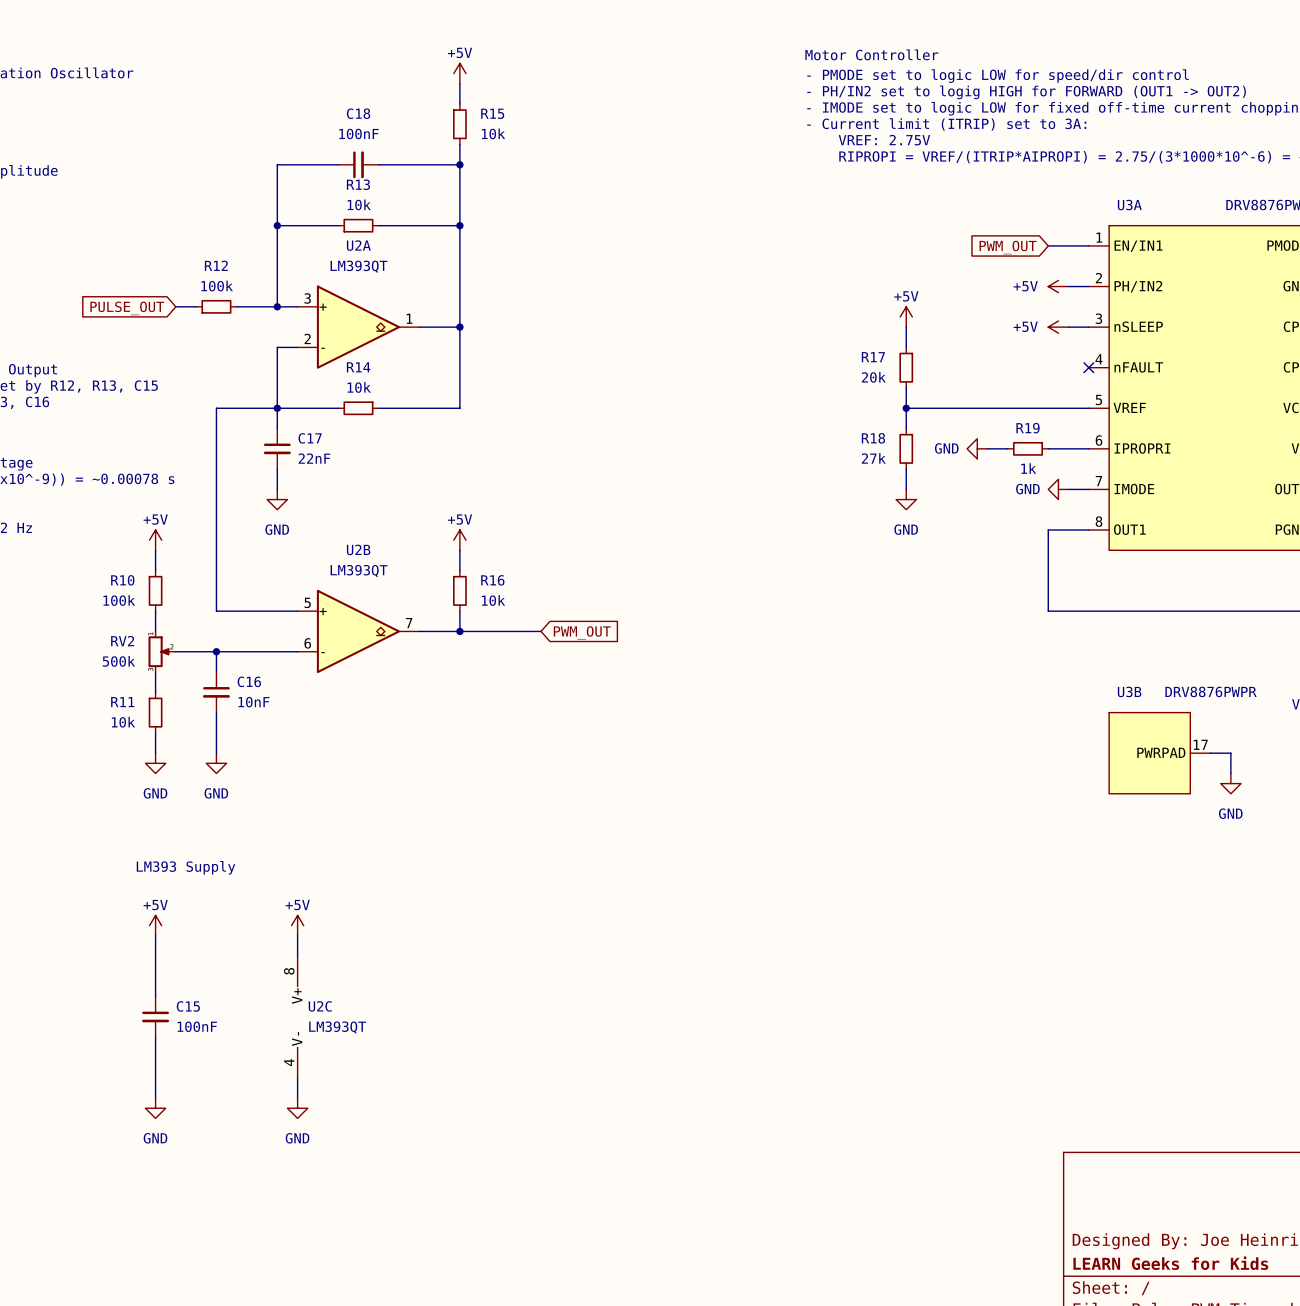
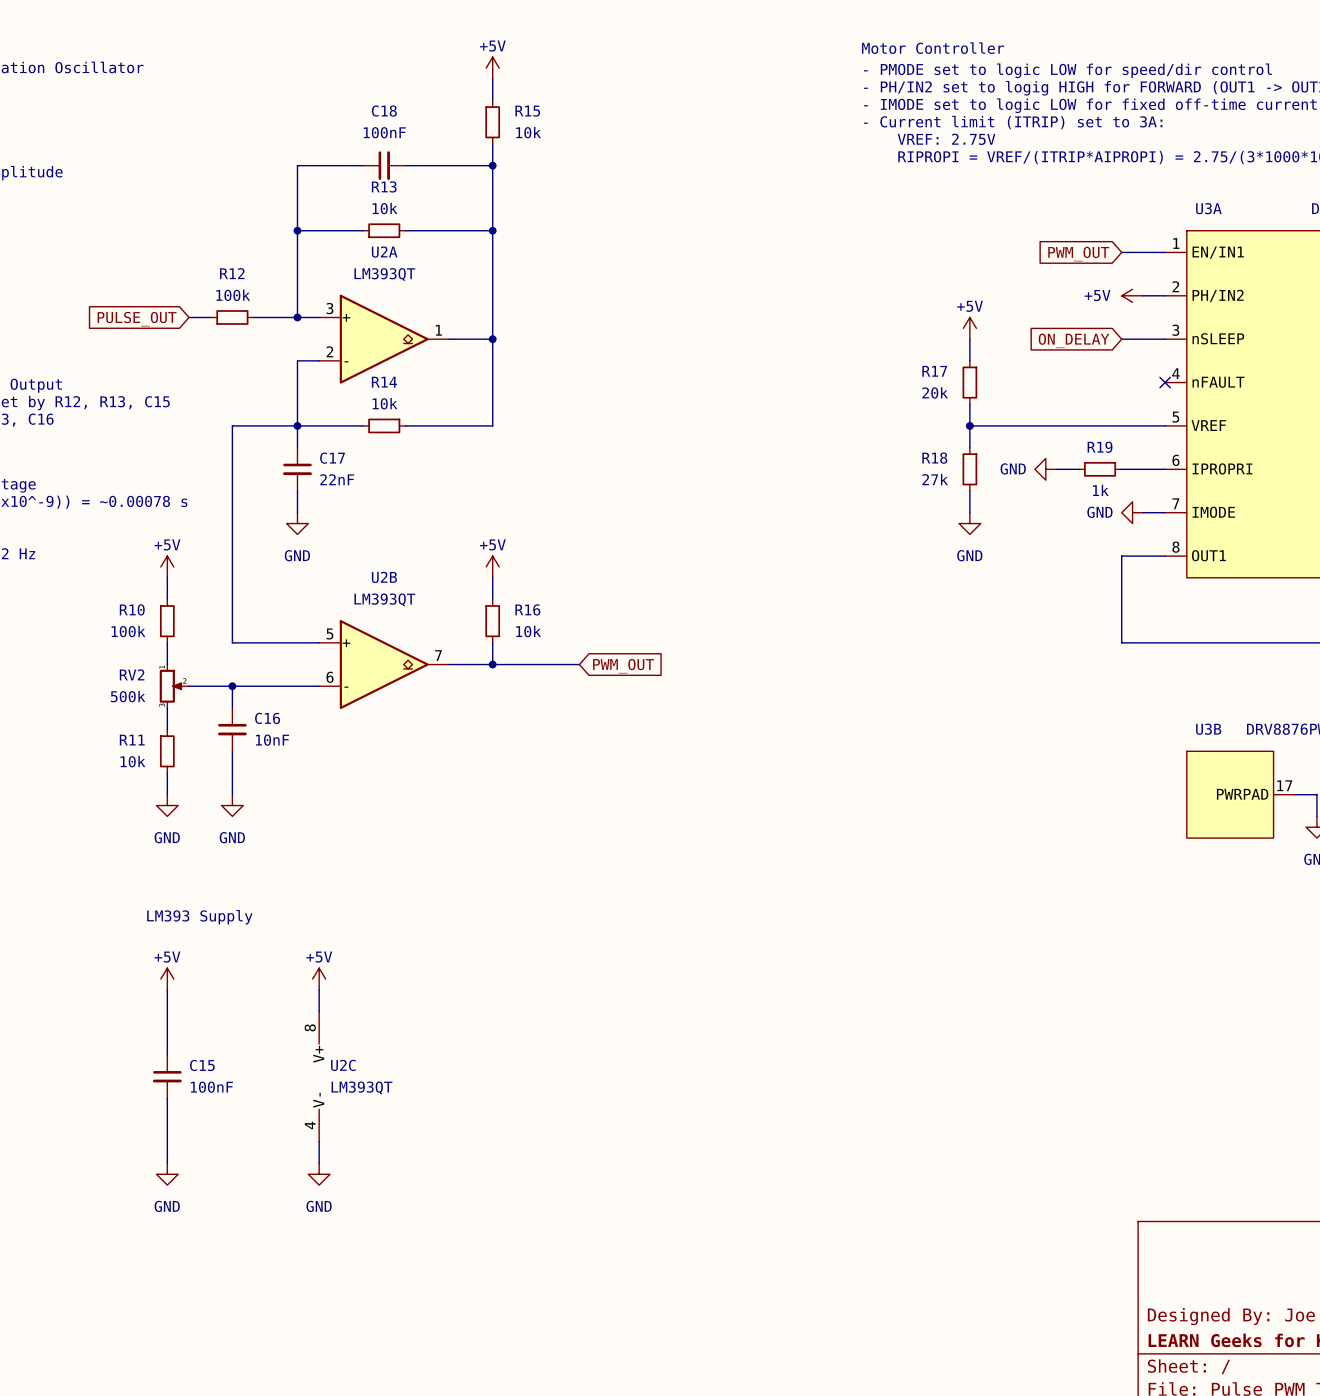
power symbol: +5V (1058, 327) -> none
global label: none -> ON_DELAY (1073, 340)

